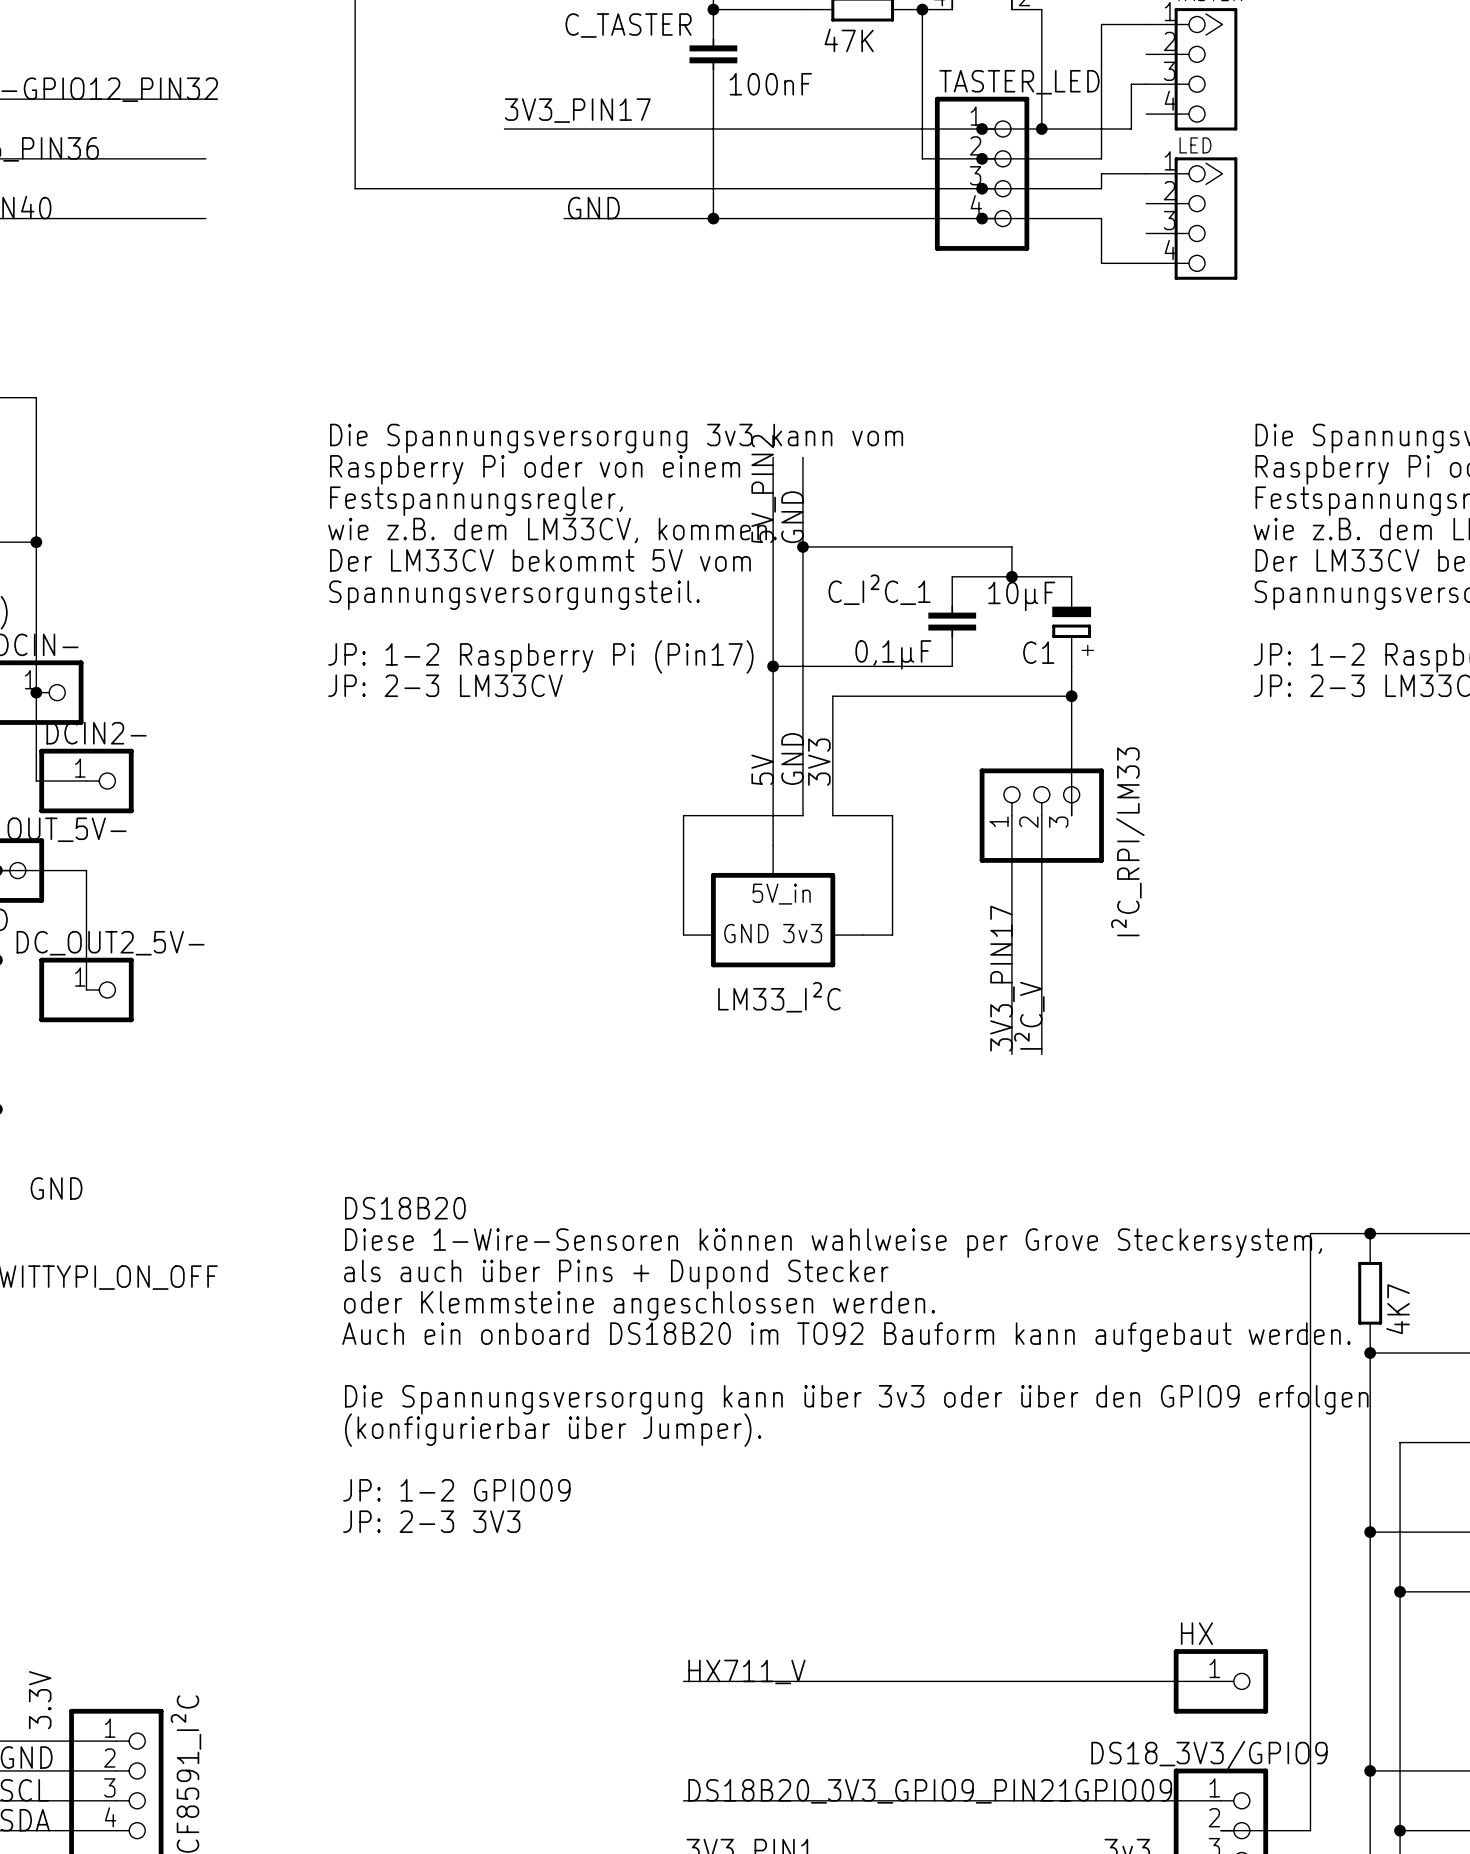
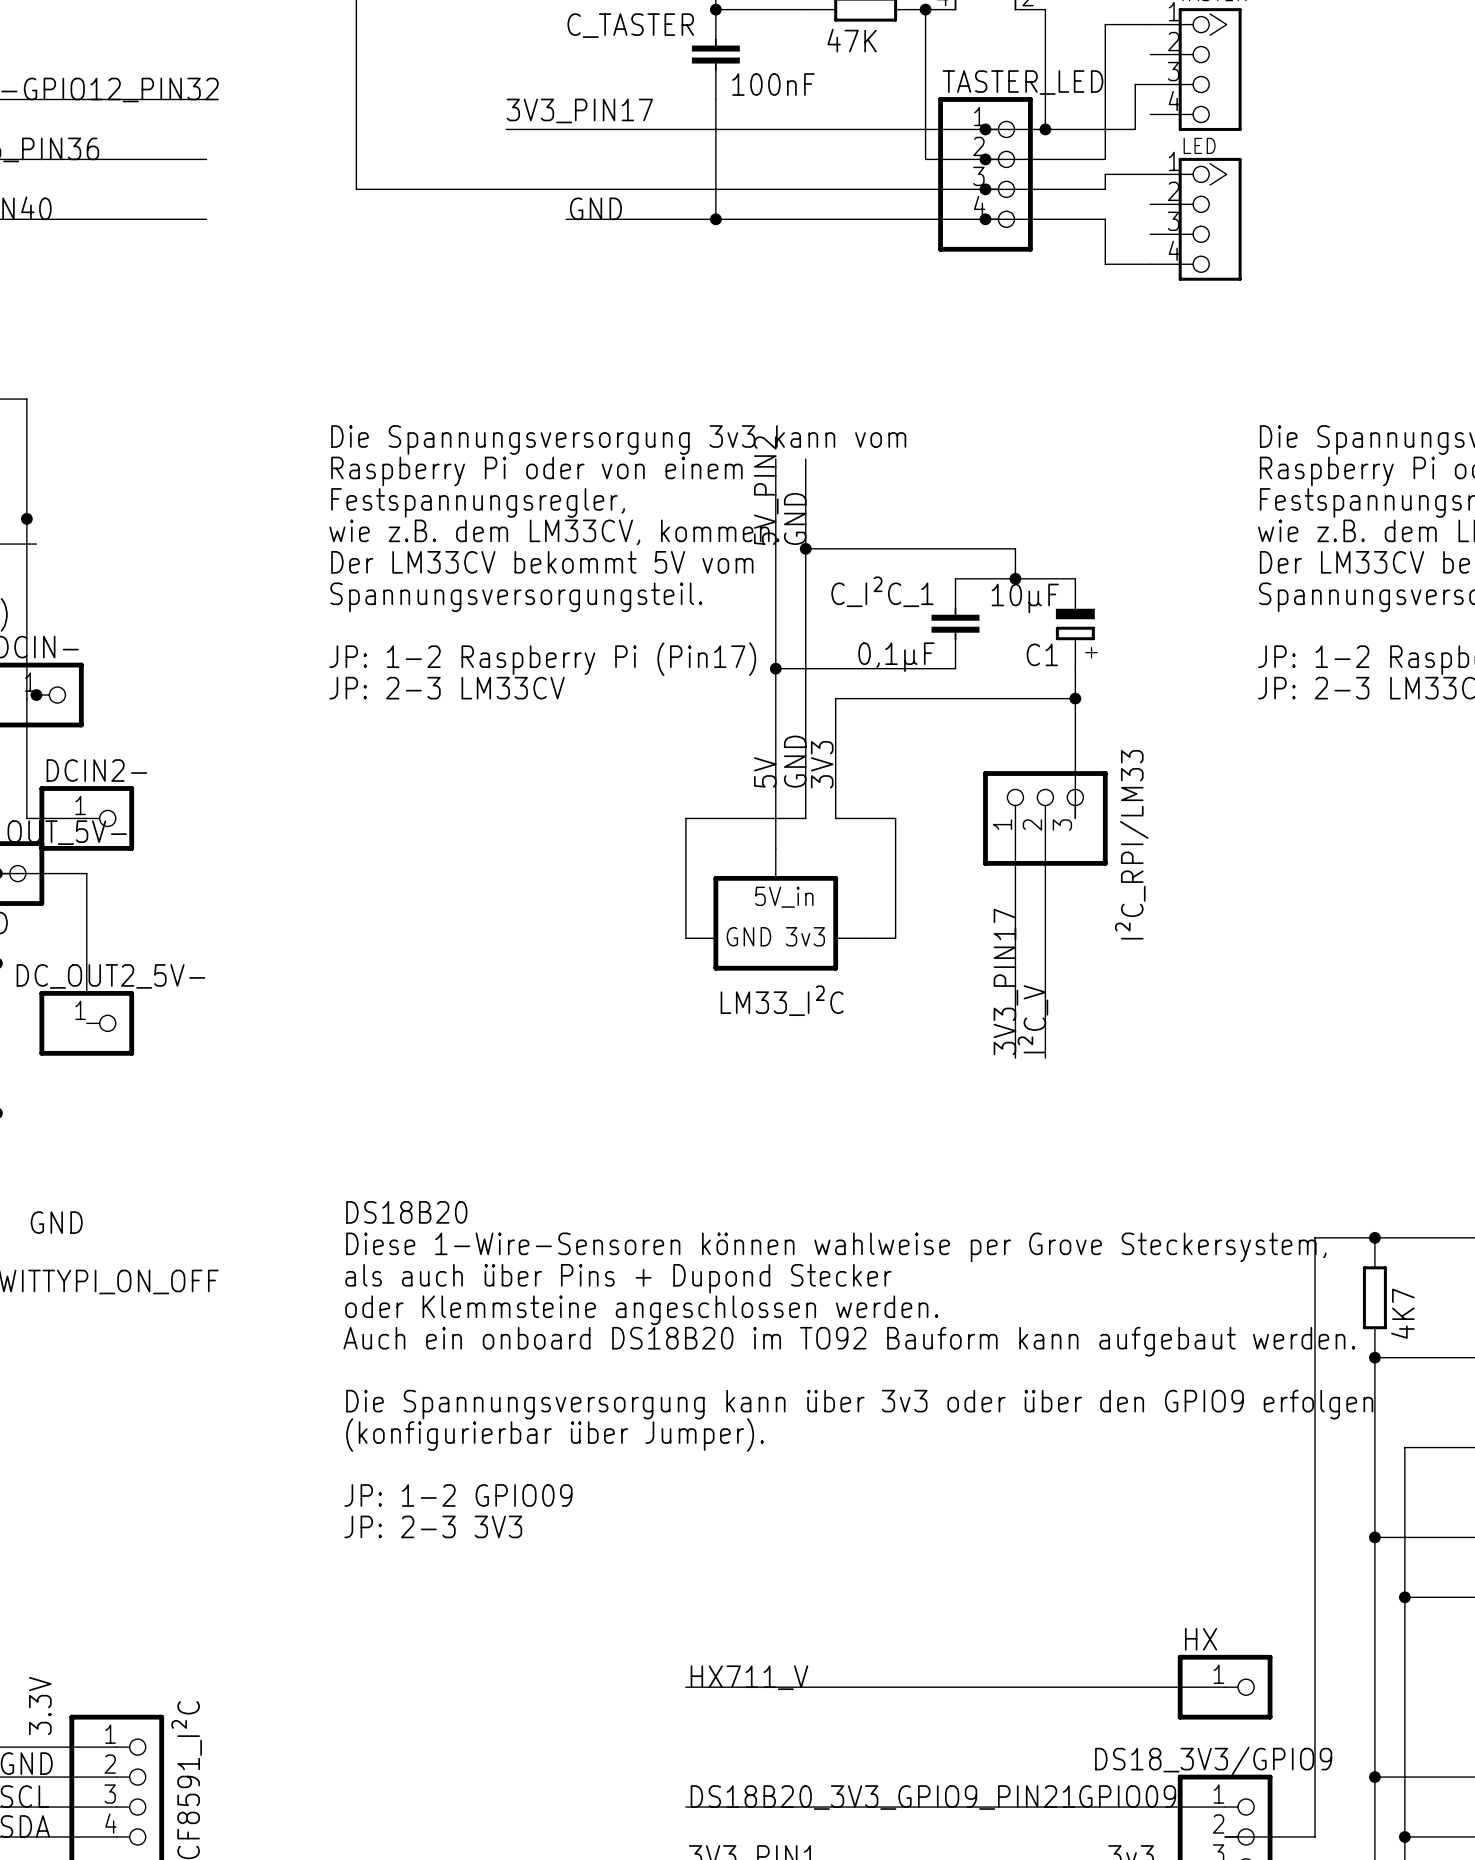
wire: (26, 397) (36, 397) (36, 781) (86, 781) -> (26, 399) (26, 818) (86, 818)
junction position: (36, 542) -> (26, 518)
DCIN2- position: (86, 781) -> (86, 818)
DC_OUT2_5V- position: (86, 989) -> (86, 1023)
label position: GND (56, 1188) -> GND (56, 1222)

